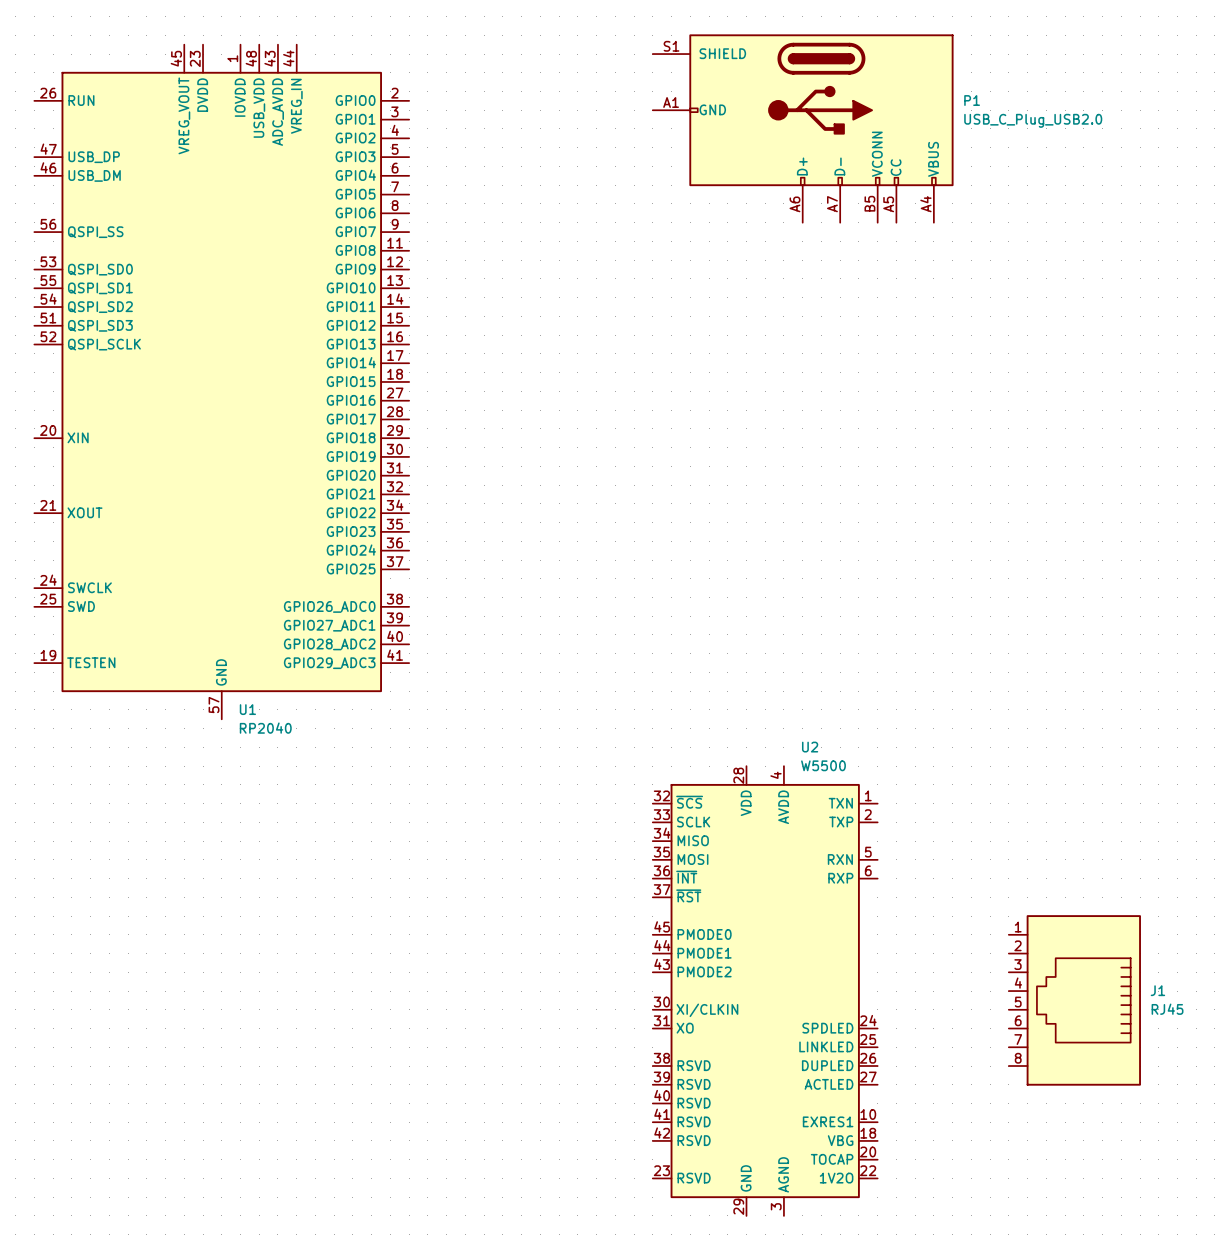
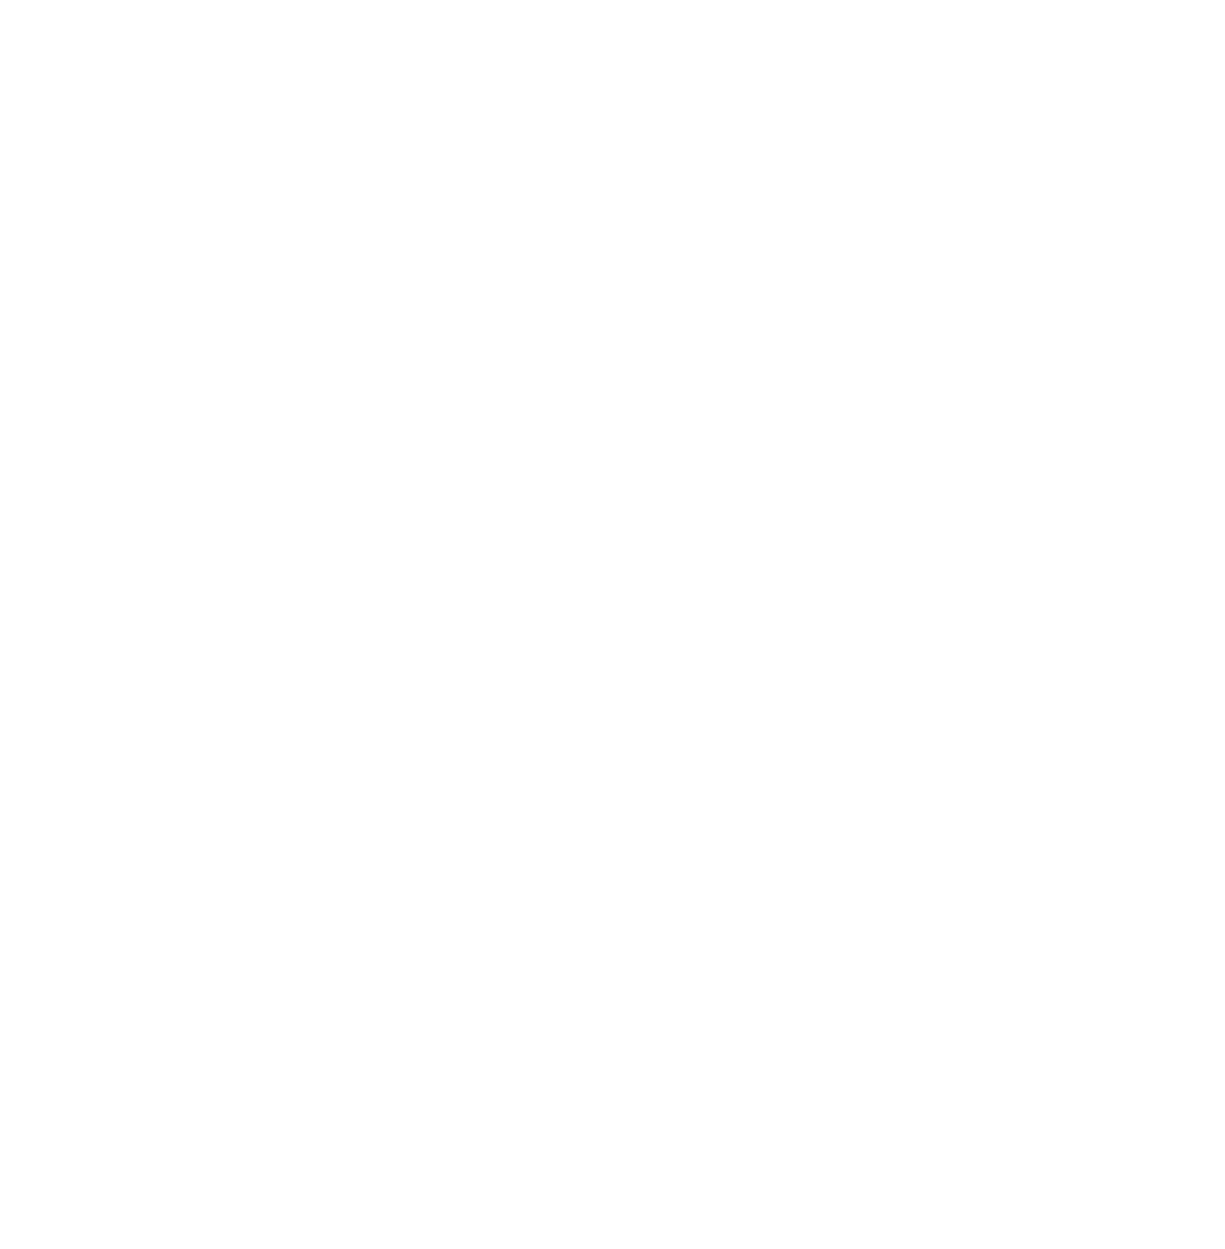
P1: USB_C_Plug_USB2.0 (803, 128) -> none
U1: RP2040 (221, 381) -> none
U2: W5500 (765, 991) -> none
J1: RJ45 (1074, 1000) -> none

